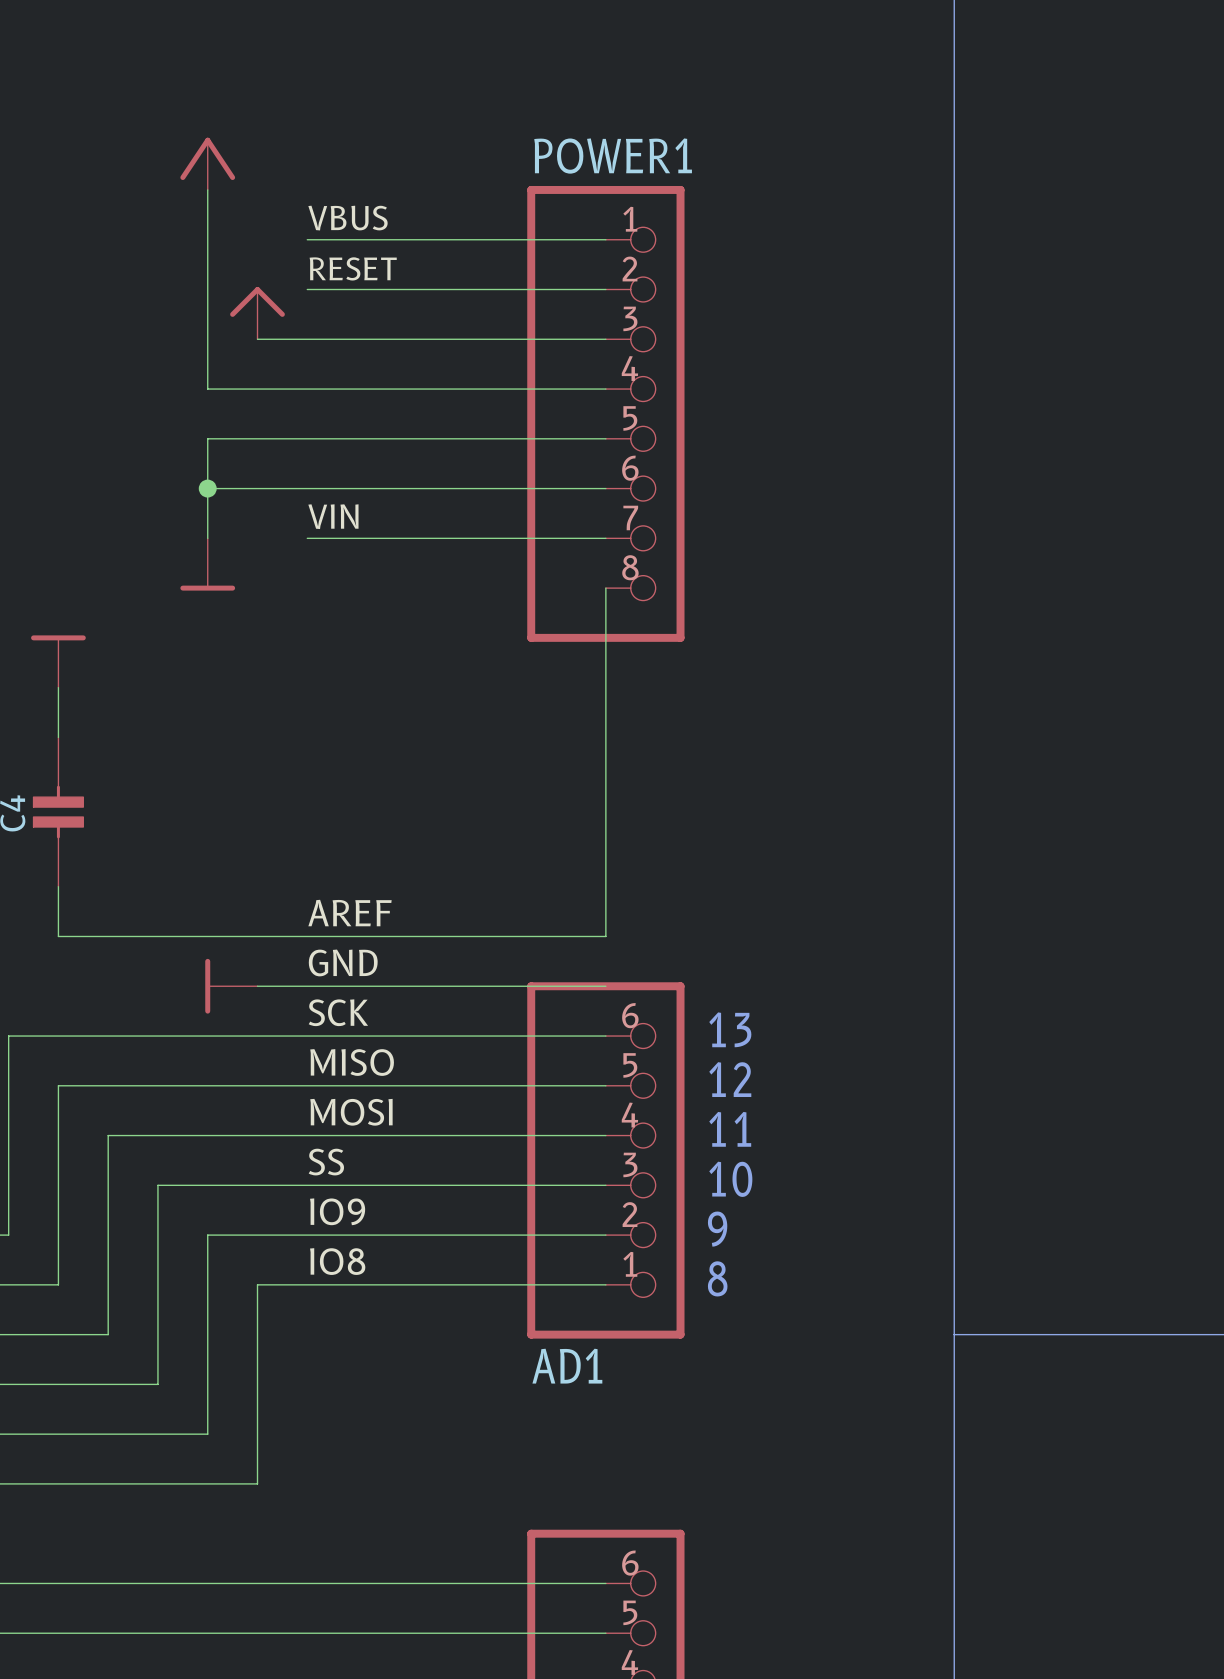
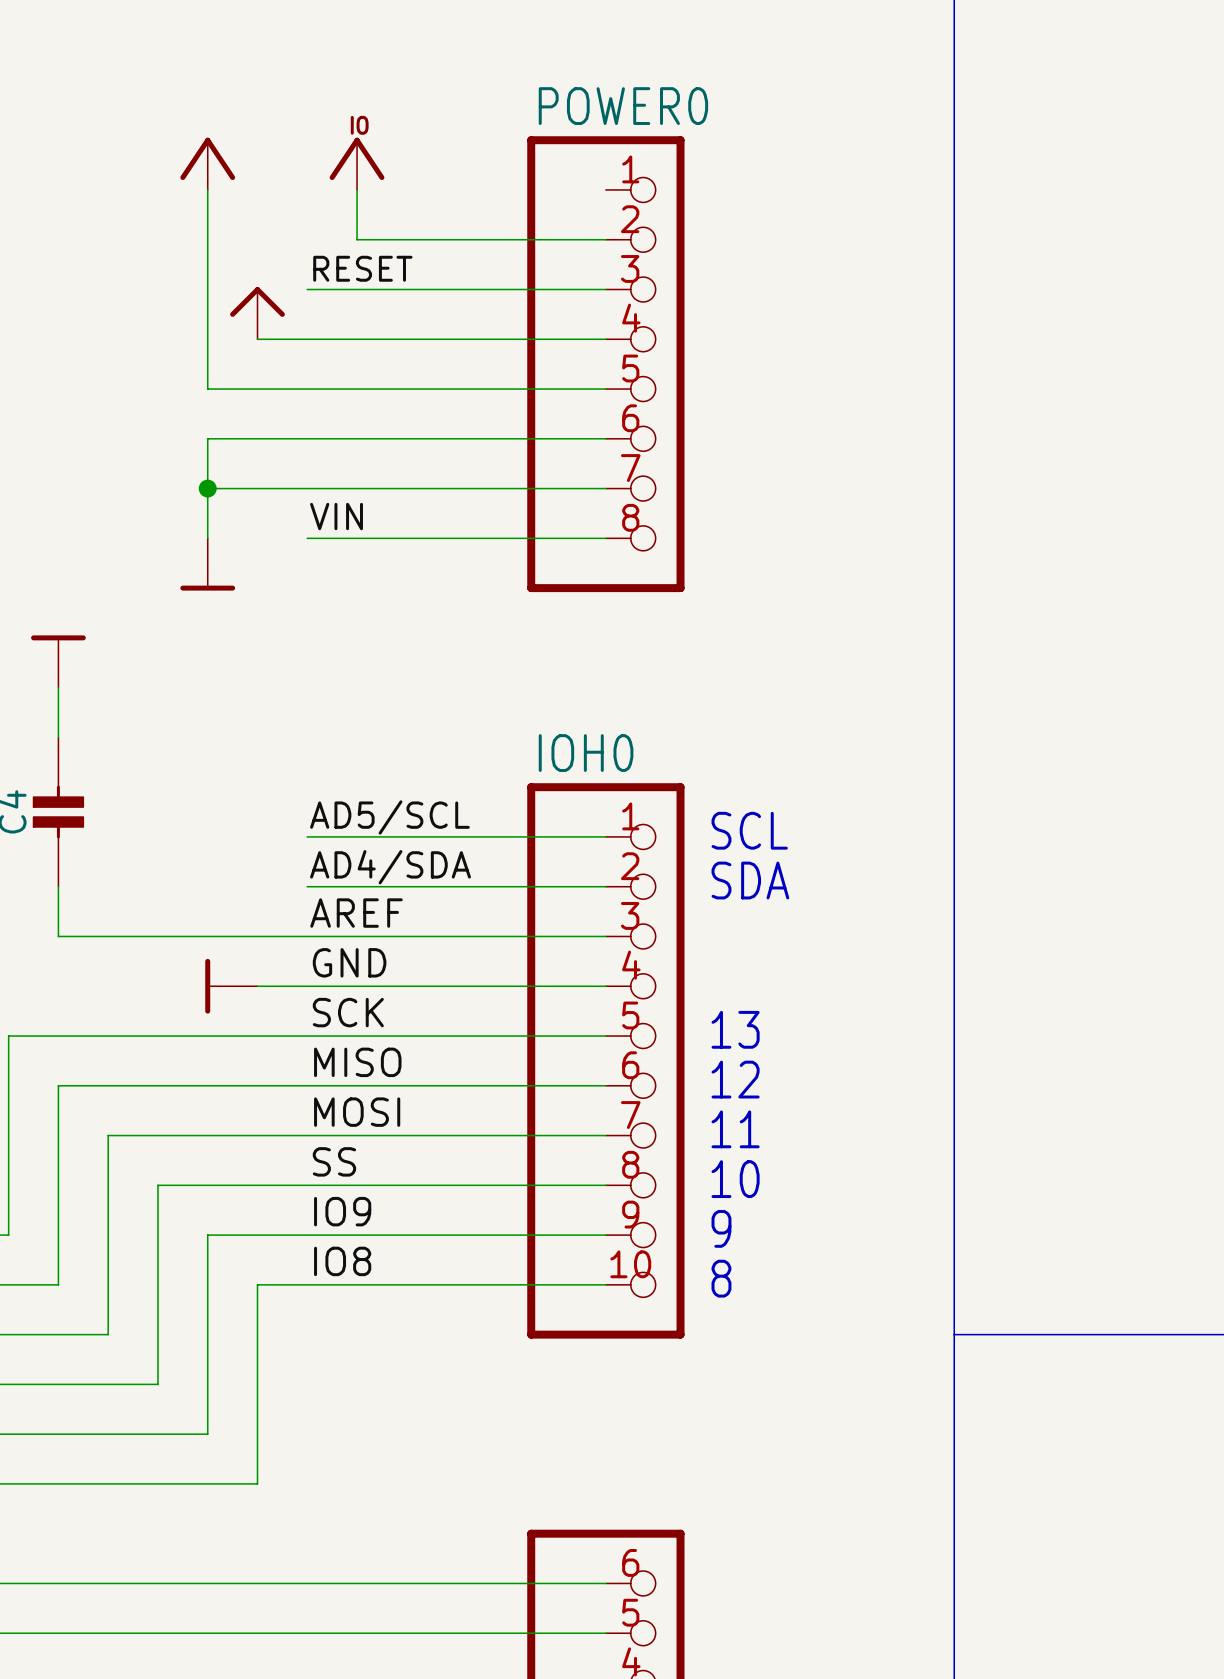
power symbol: none -> (357, 163)
label: VBUS (347, 218) -> none
wire: (307, 239) (357, 239) -> (357, 189) (357, 239)
POWER0: none -> (605, 364)
POWER1: (605, 413) -> none
wire: (605, 588) (605, 936) -> none
label: none -> AD5/SCL (389, 817)
text: none -> SCL (749, 830)
wire: none -> (307, 836) (605, 836)
label: none -> AD4/SDA (390, 867)
text: none -> SDA (750, 880)
wire: none -> (307, 886) (605, 886)
IOH0: none -> (605, 1060)
AD1: (605, 1160) -> none

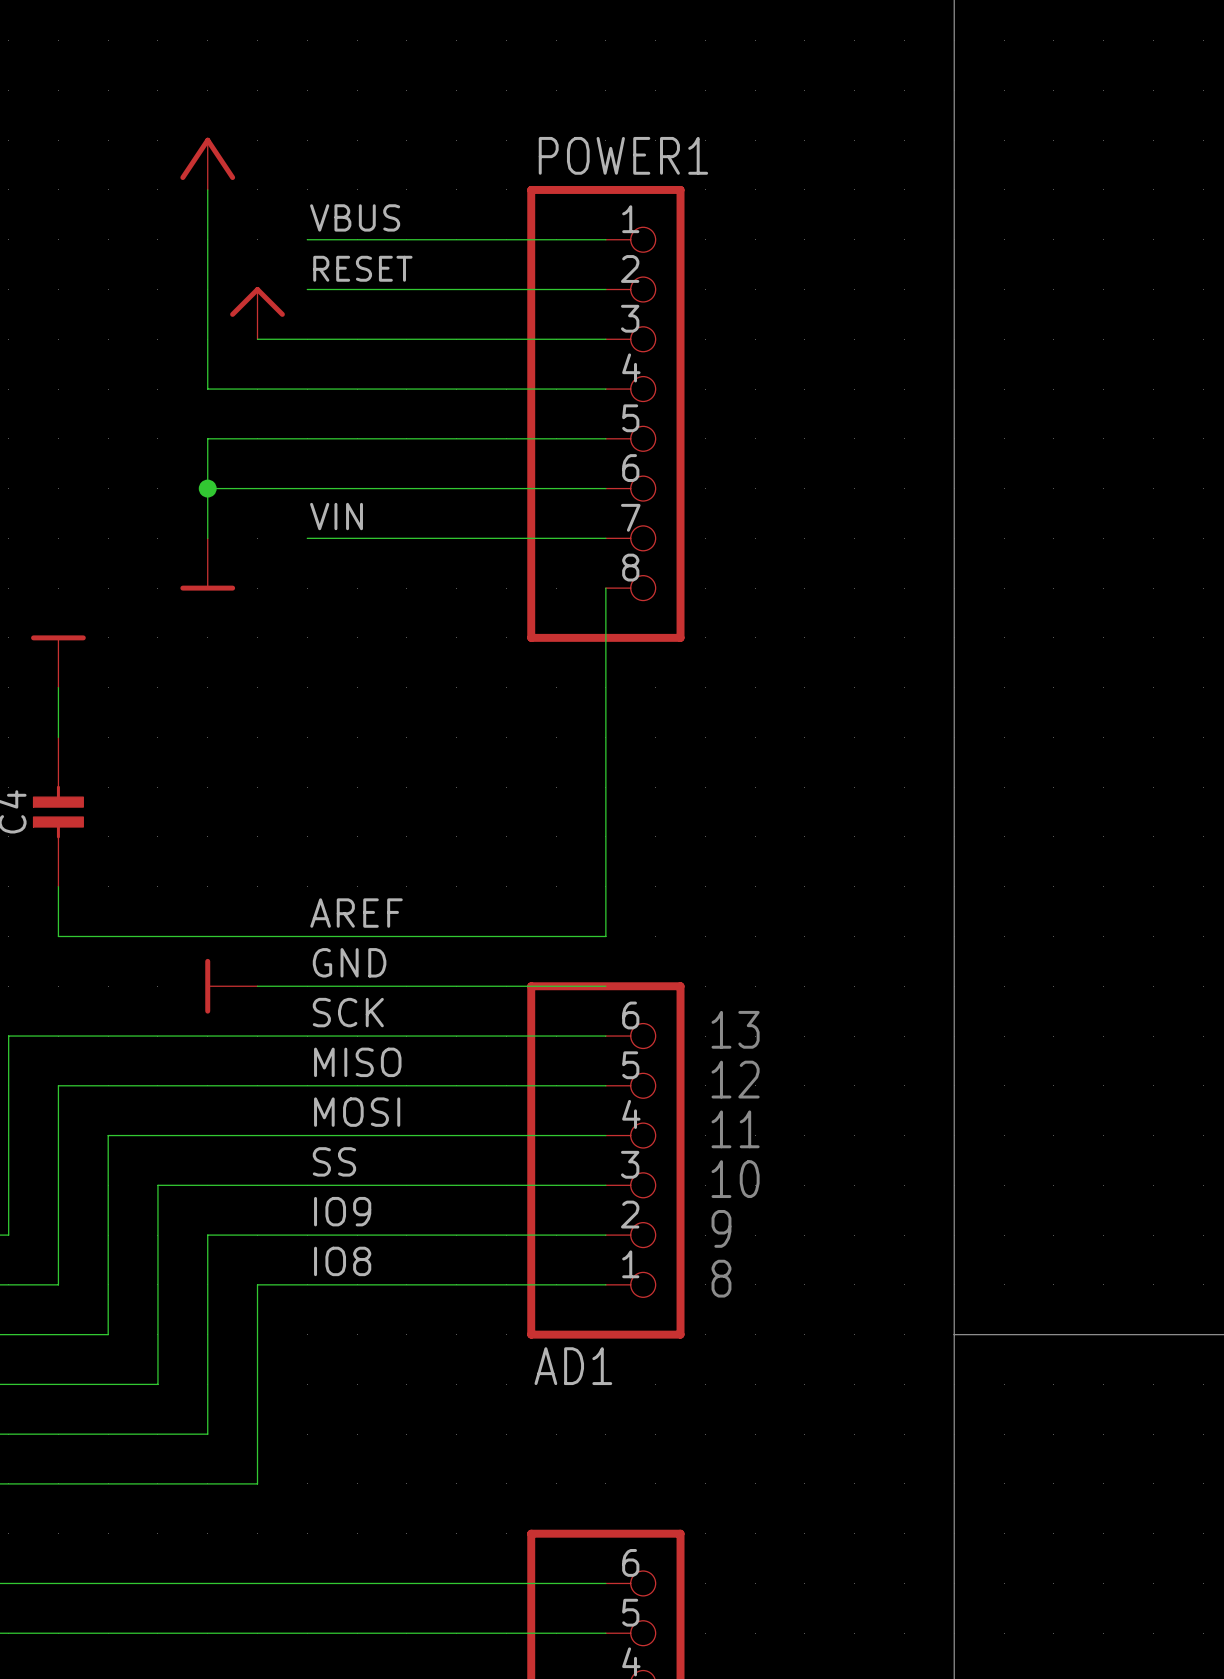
power symbol: (357, 163) -> none
wire: (357, 189) (357, 239) -> (307, 239) (357, 239)
label: none -> VBUS (355, 217)
POWER0: (605, 364) -> none
POWER1: none -> (605, 413)
wire: none -> (605, 588) (605, 936)
label: AD5/SCL (389, 817) -> none
text: SCL (749, 830) -> none
wire: (307, 836) (605, 836) -> none
label: AD4/SDA (390, 867) -> none
text: SDA (750, 880) -> none
wire: (307, 886) (605, 886) -> none
IOH0: (605, 1060) -> none
AD1: none -> (605, 1160)

